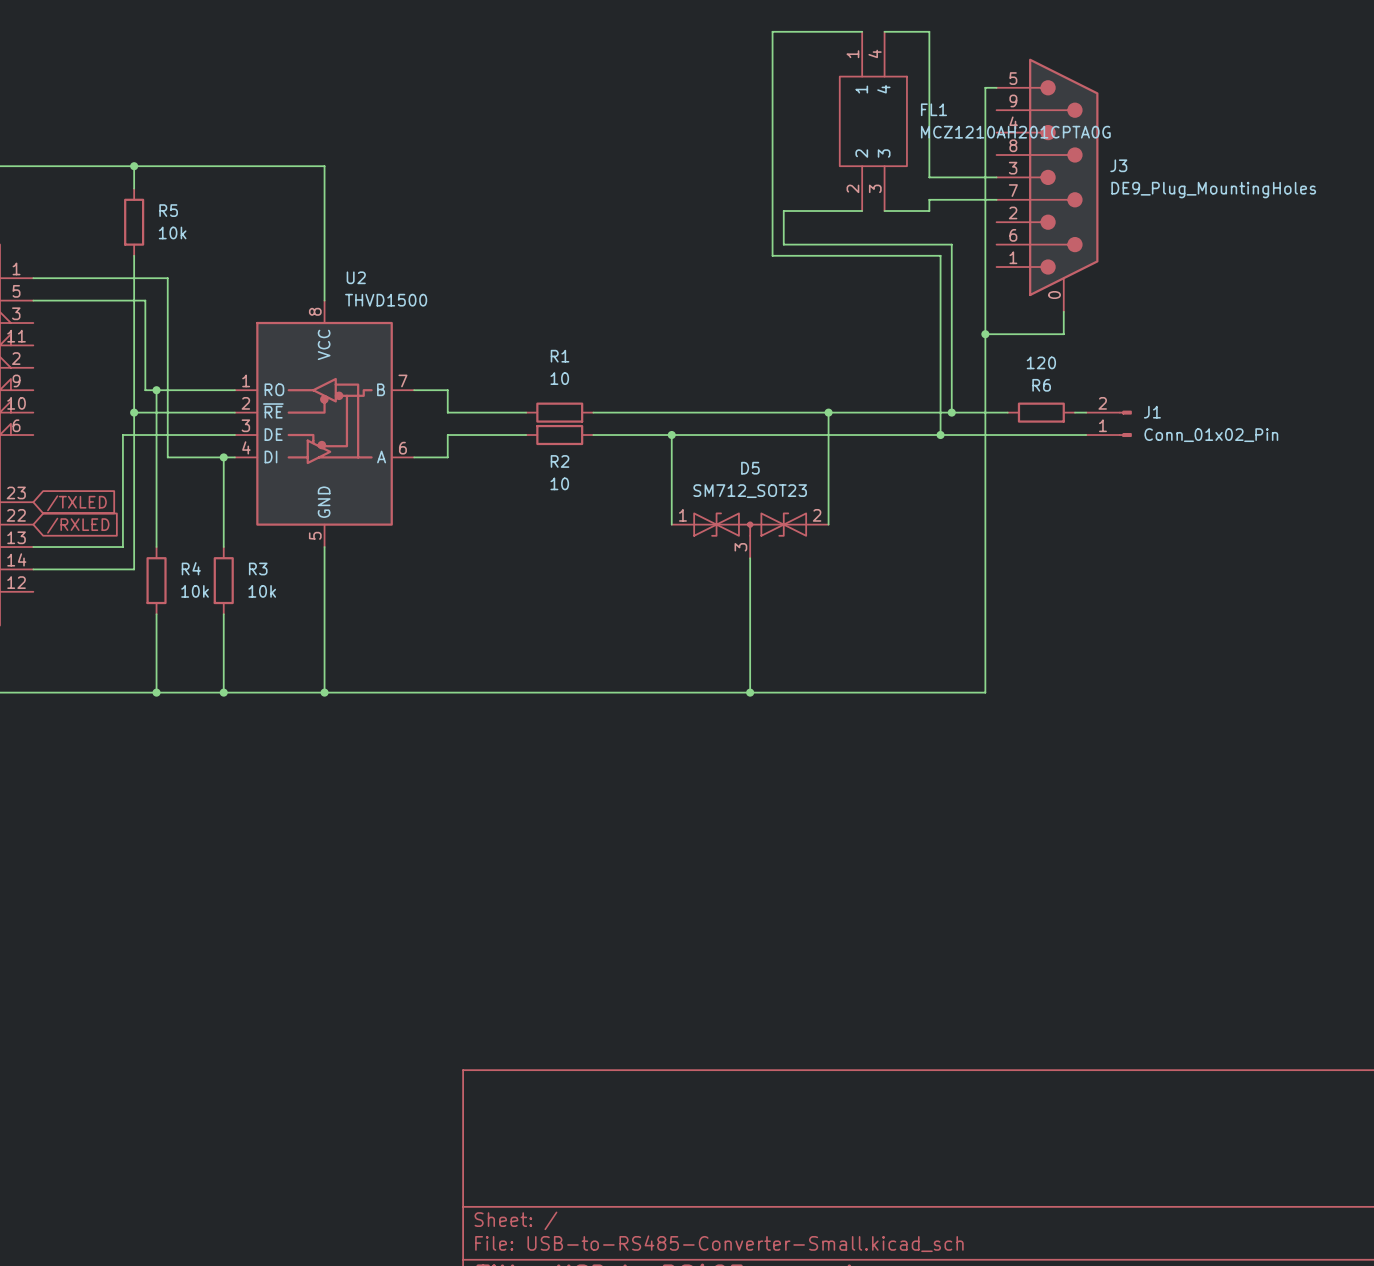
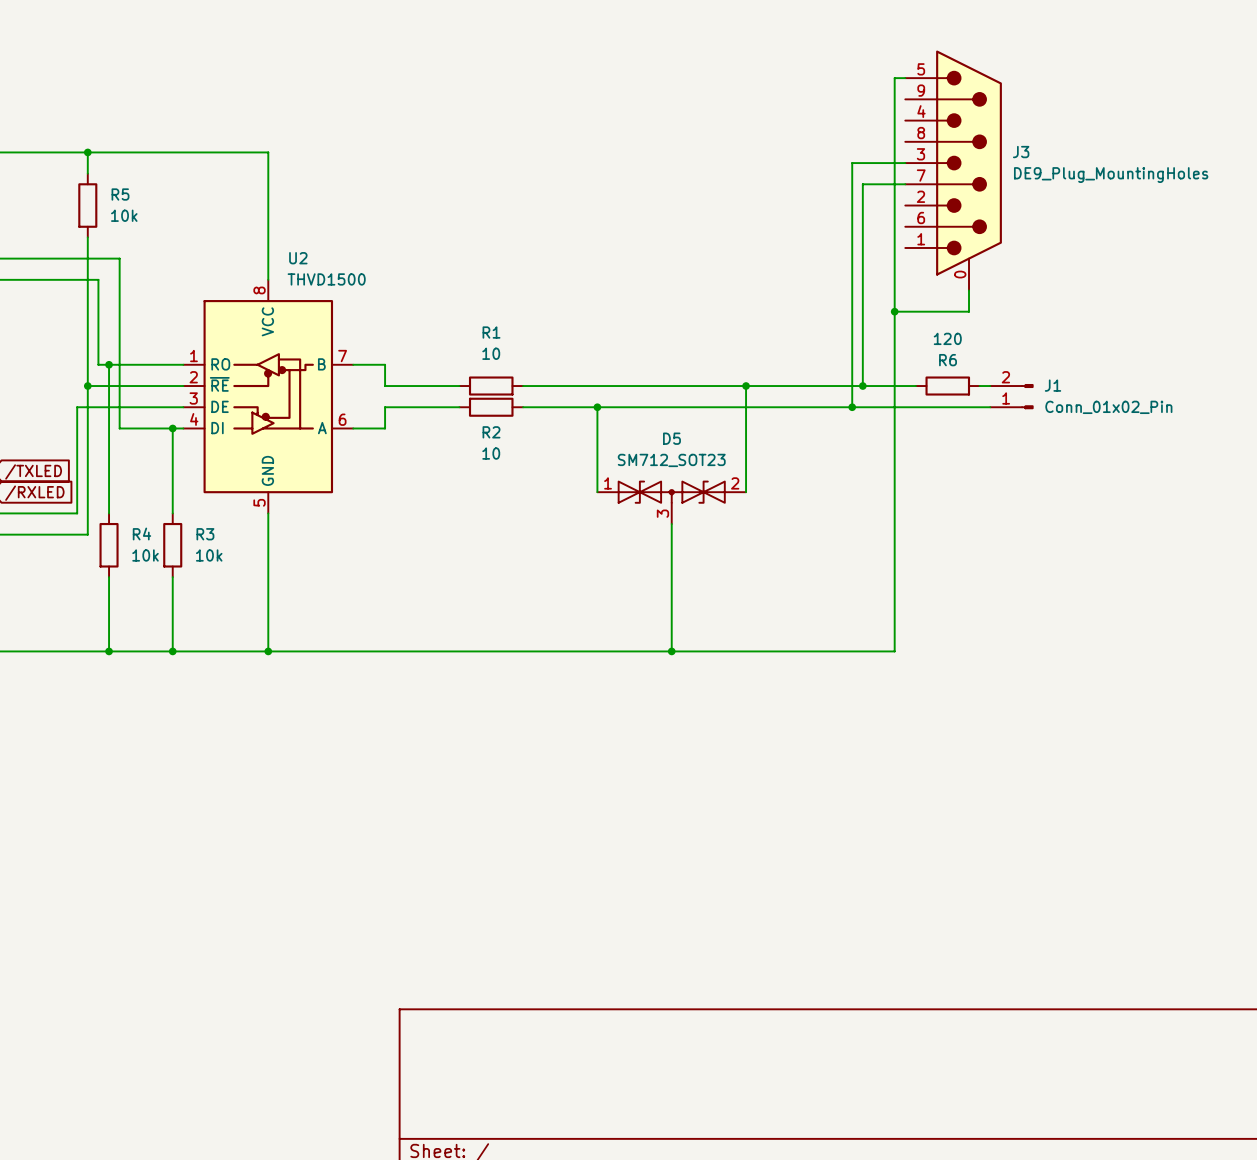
wire: (862, 31) (772, 31) (772, 255) (940, 255) -> (852, 163) (852, 237)
wire: (884, 31) (929, 31) (929, 177) (940, 177) -> none
FL1: MCZ1210AH201CPTA0G (873, 121) -> none
wire: (951, 199) (929, 199) (929, 211) (884, 211) -> (862, 184) (862, 226)
wire: (862, 211) (783, 211) (783, 244) (951, 244) -> none

